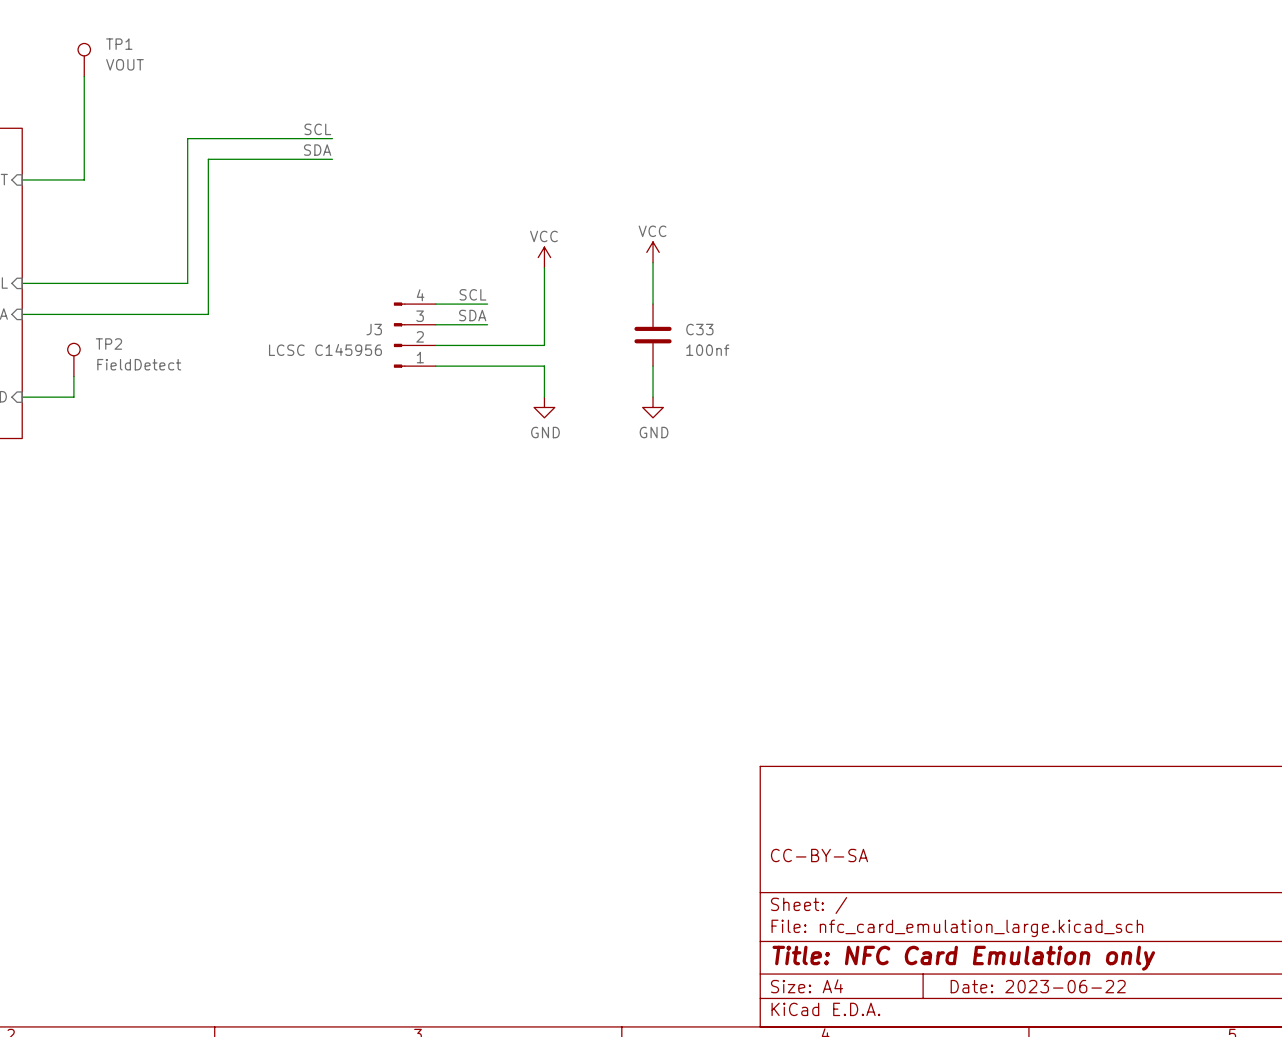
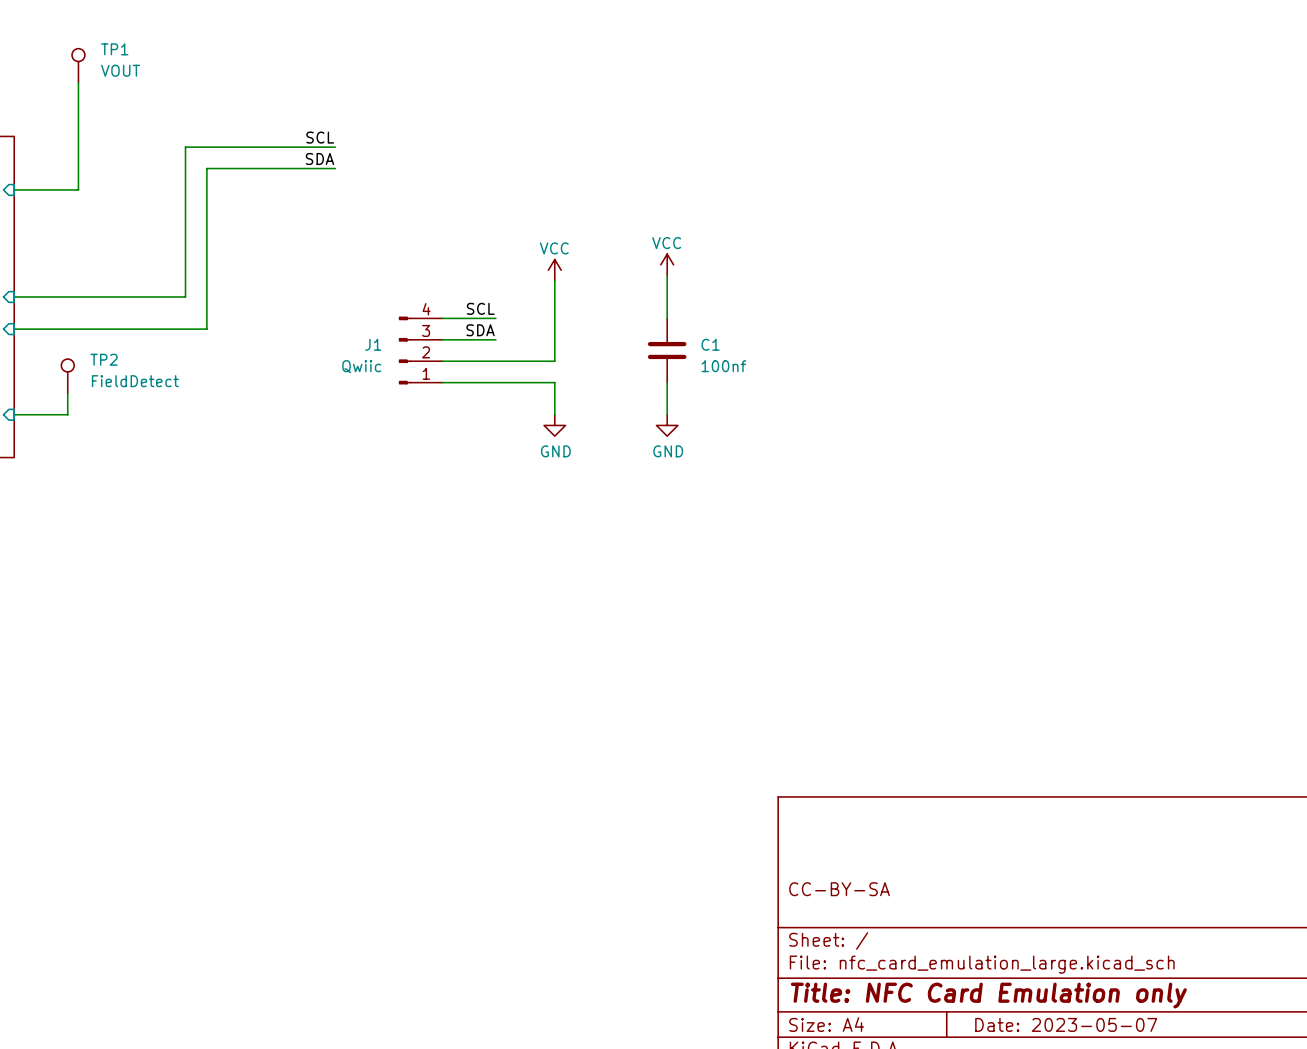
J3 name: J3 (374, 329) -> J1 (373, 344)
C33 name: C33 (699, 329) -> C1 (710, 344)
J3 value: LCSC C145956 (325, 349) -> Qwiic (361, 366)
title block: Date: 2023-06-22 (1038, 986) -> Date: 2023-05-07 (1066, 1024)

